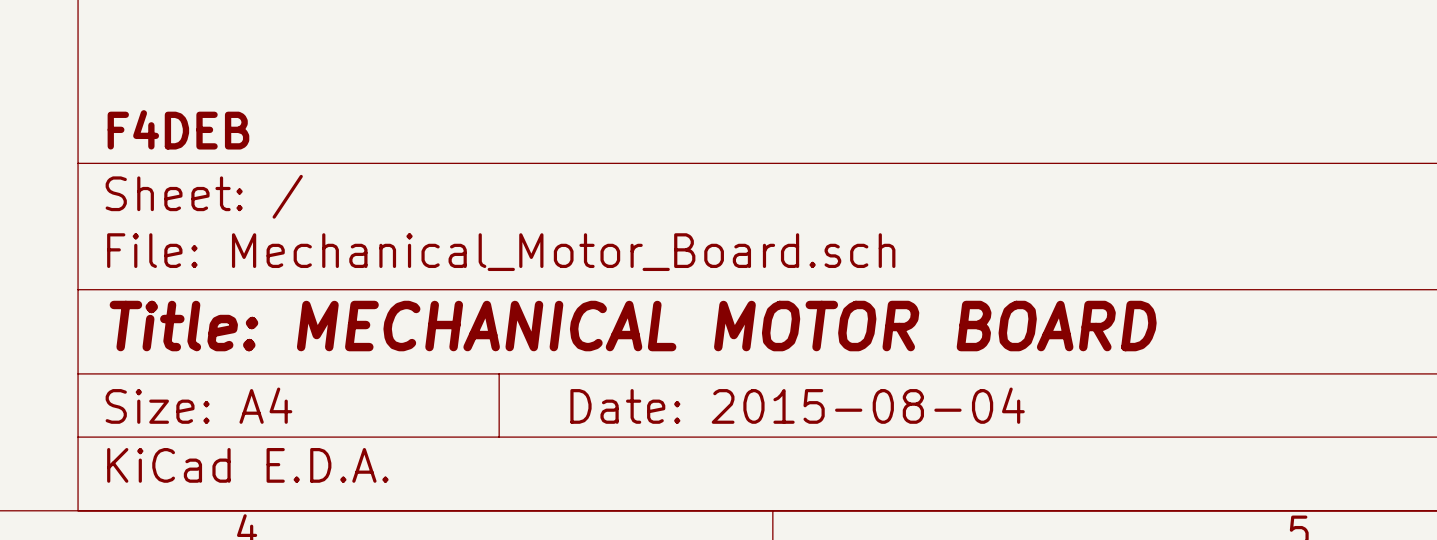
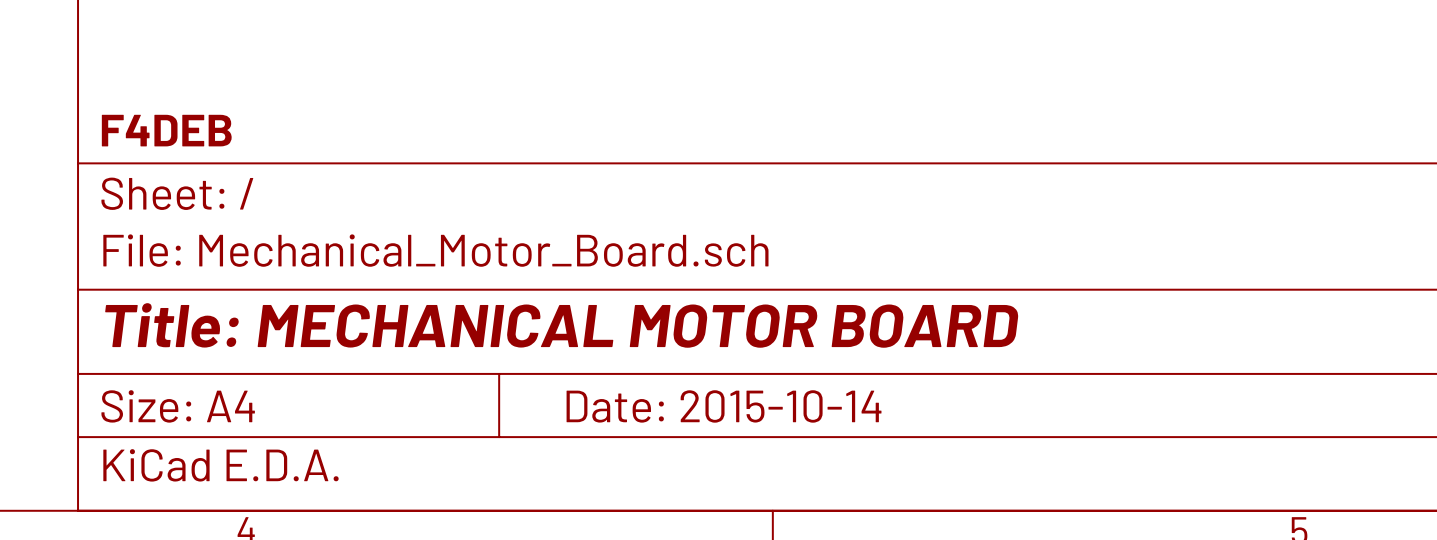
title block: Date: 2015-08-04 (797, 405) -> Date: 2015-10-14 (724, 406)

